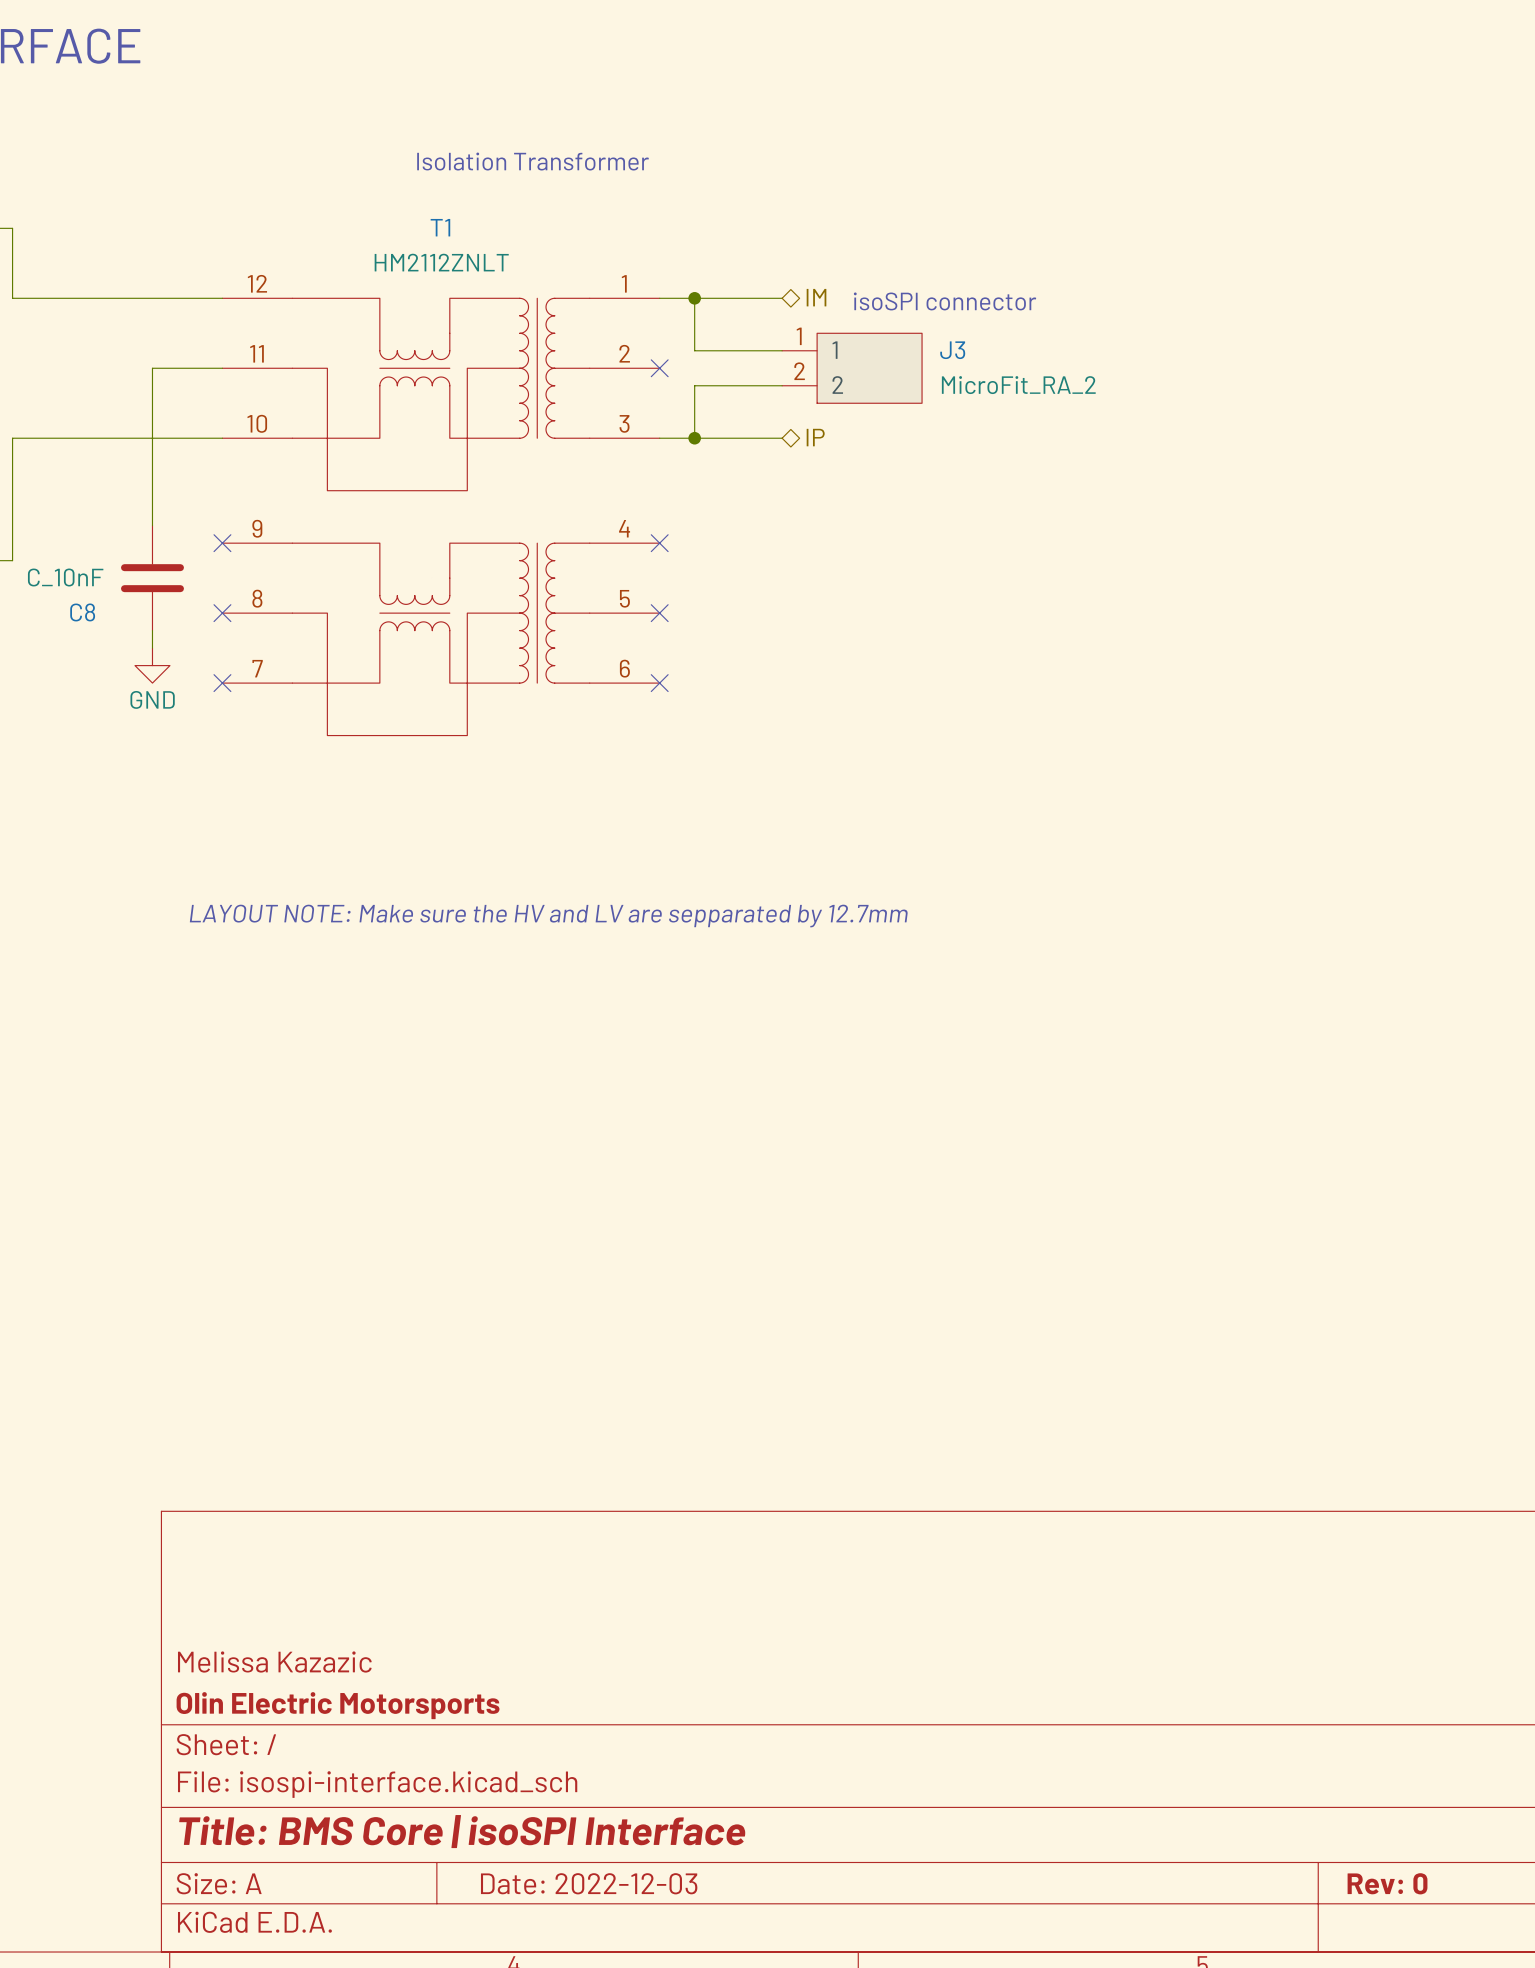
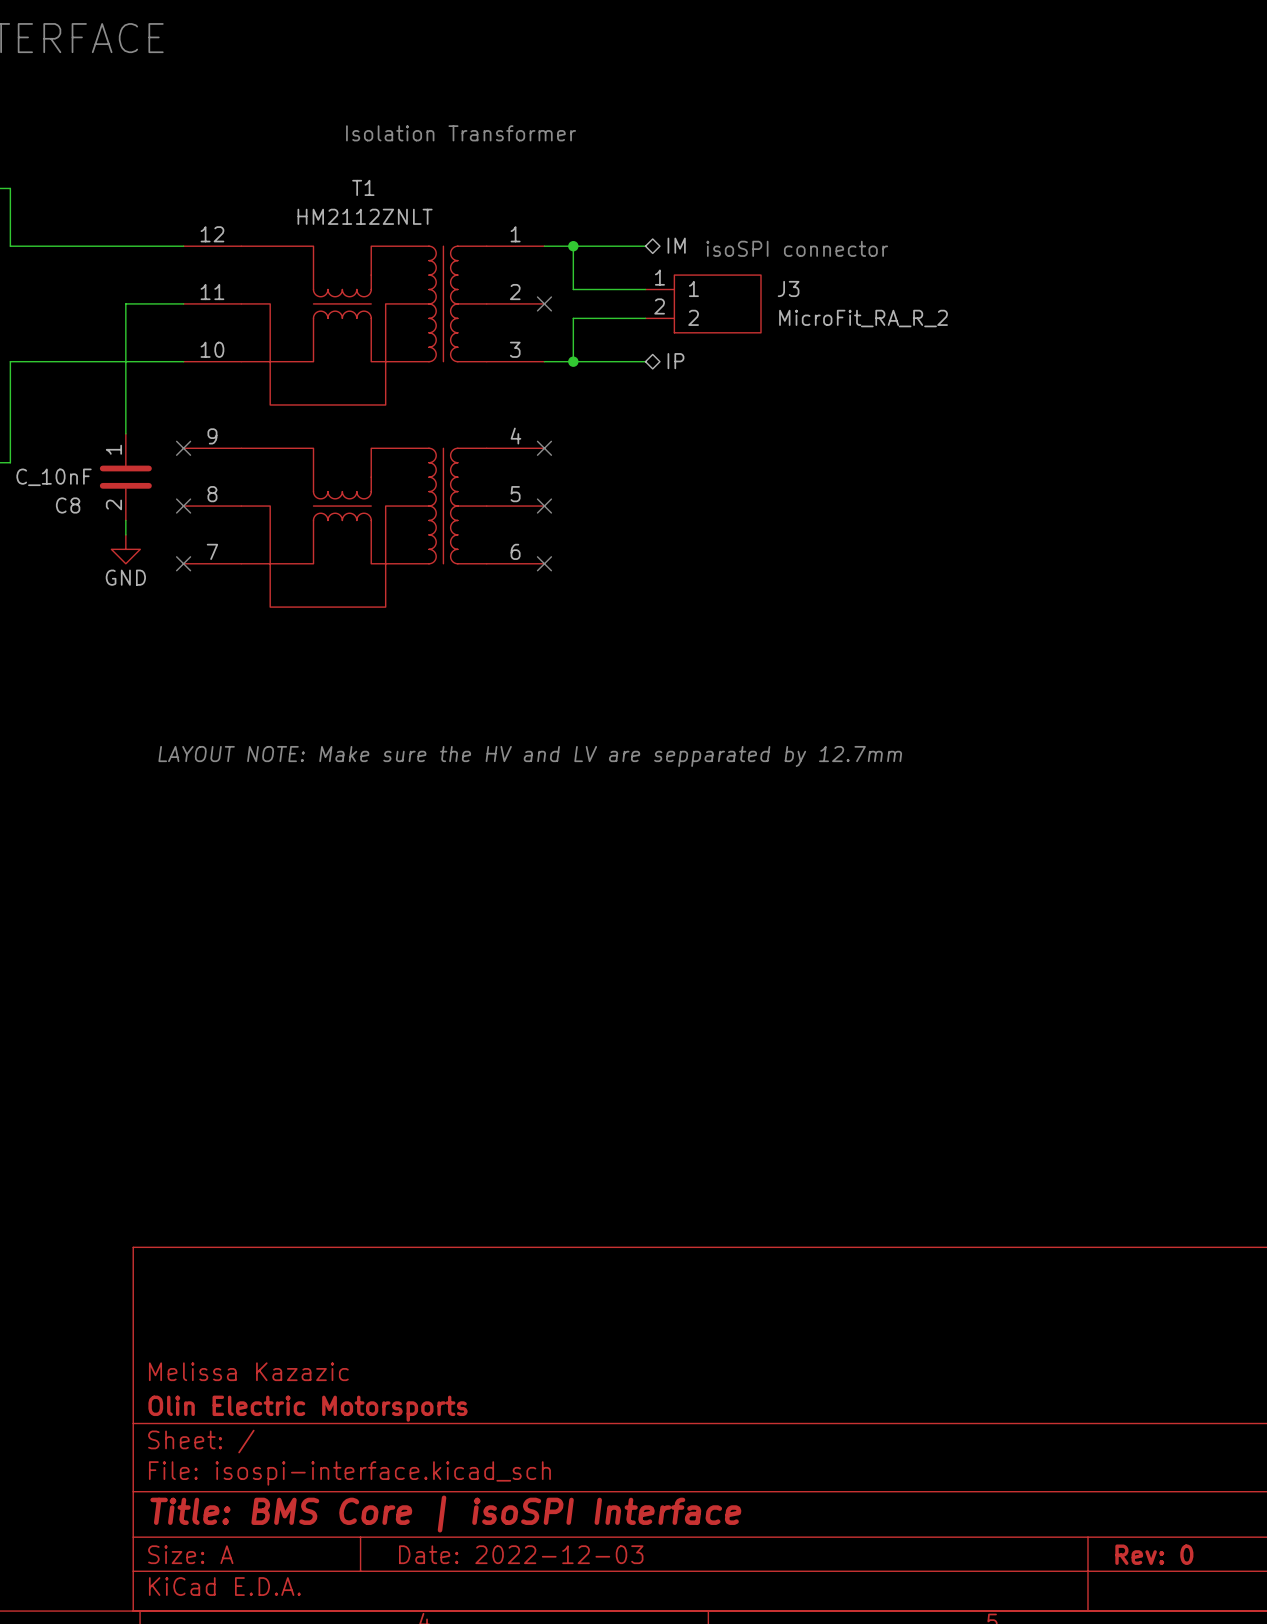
J3 value: MicroFit_RA_2 (1018, 385) -> MicroFit_RA_R_2 (863, 318)
C8 pin number: none -> 1 (113, 449)
C8 pin number: none -> 2 (113, 504)

